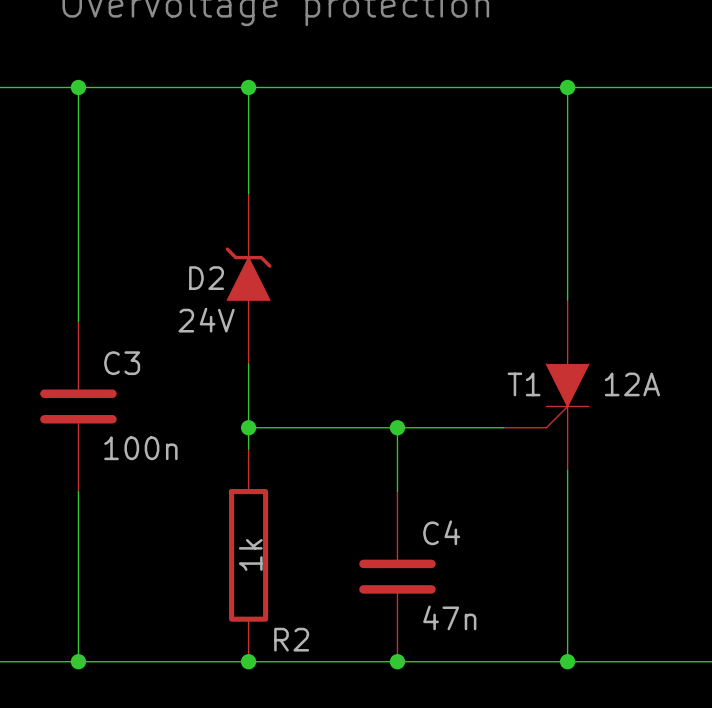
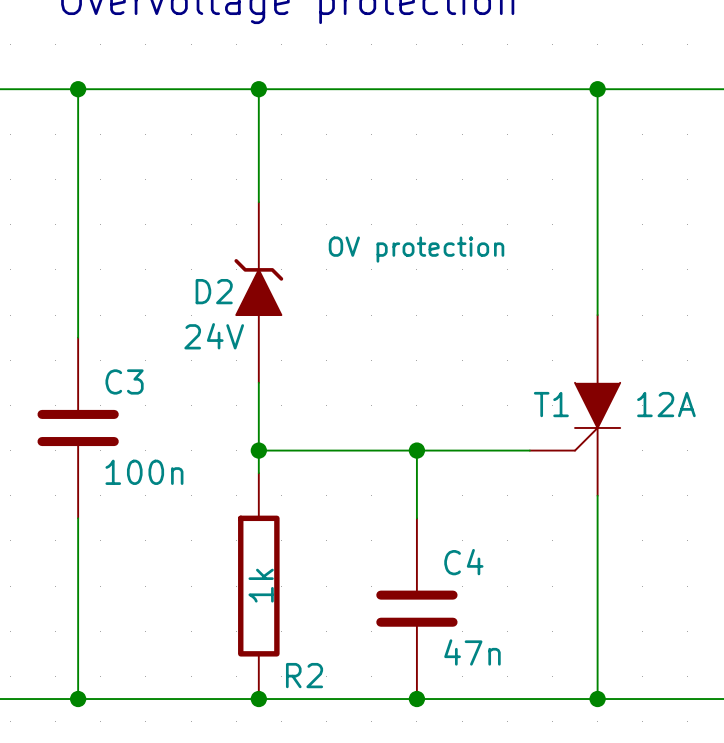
D2 text: none -> OV protection (416, 249)

